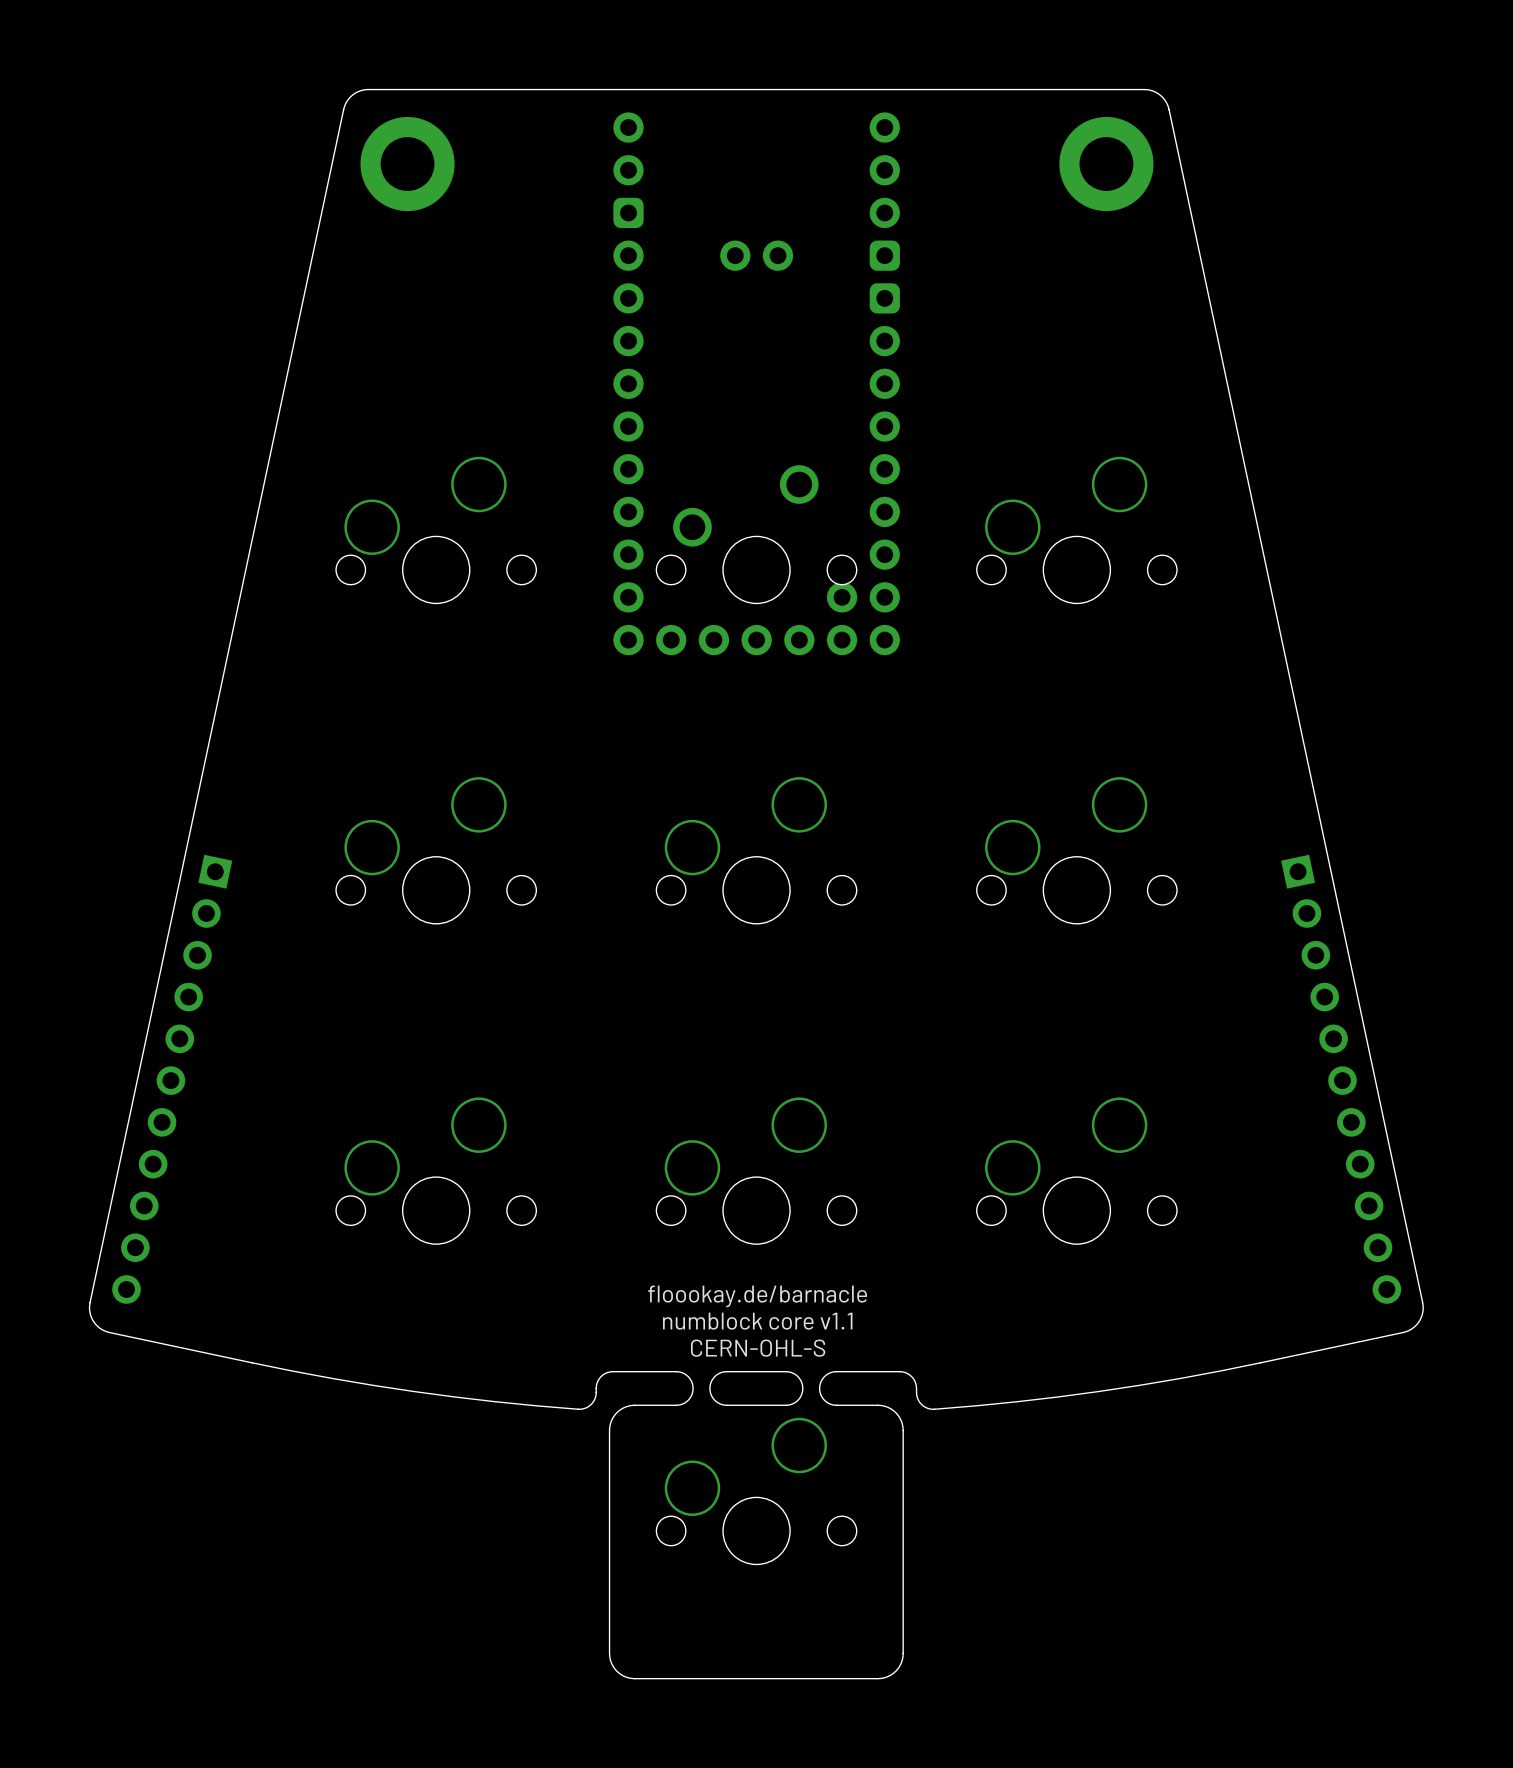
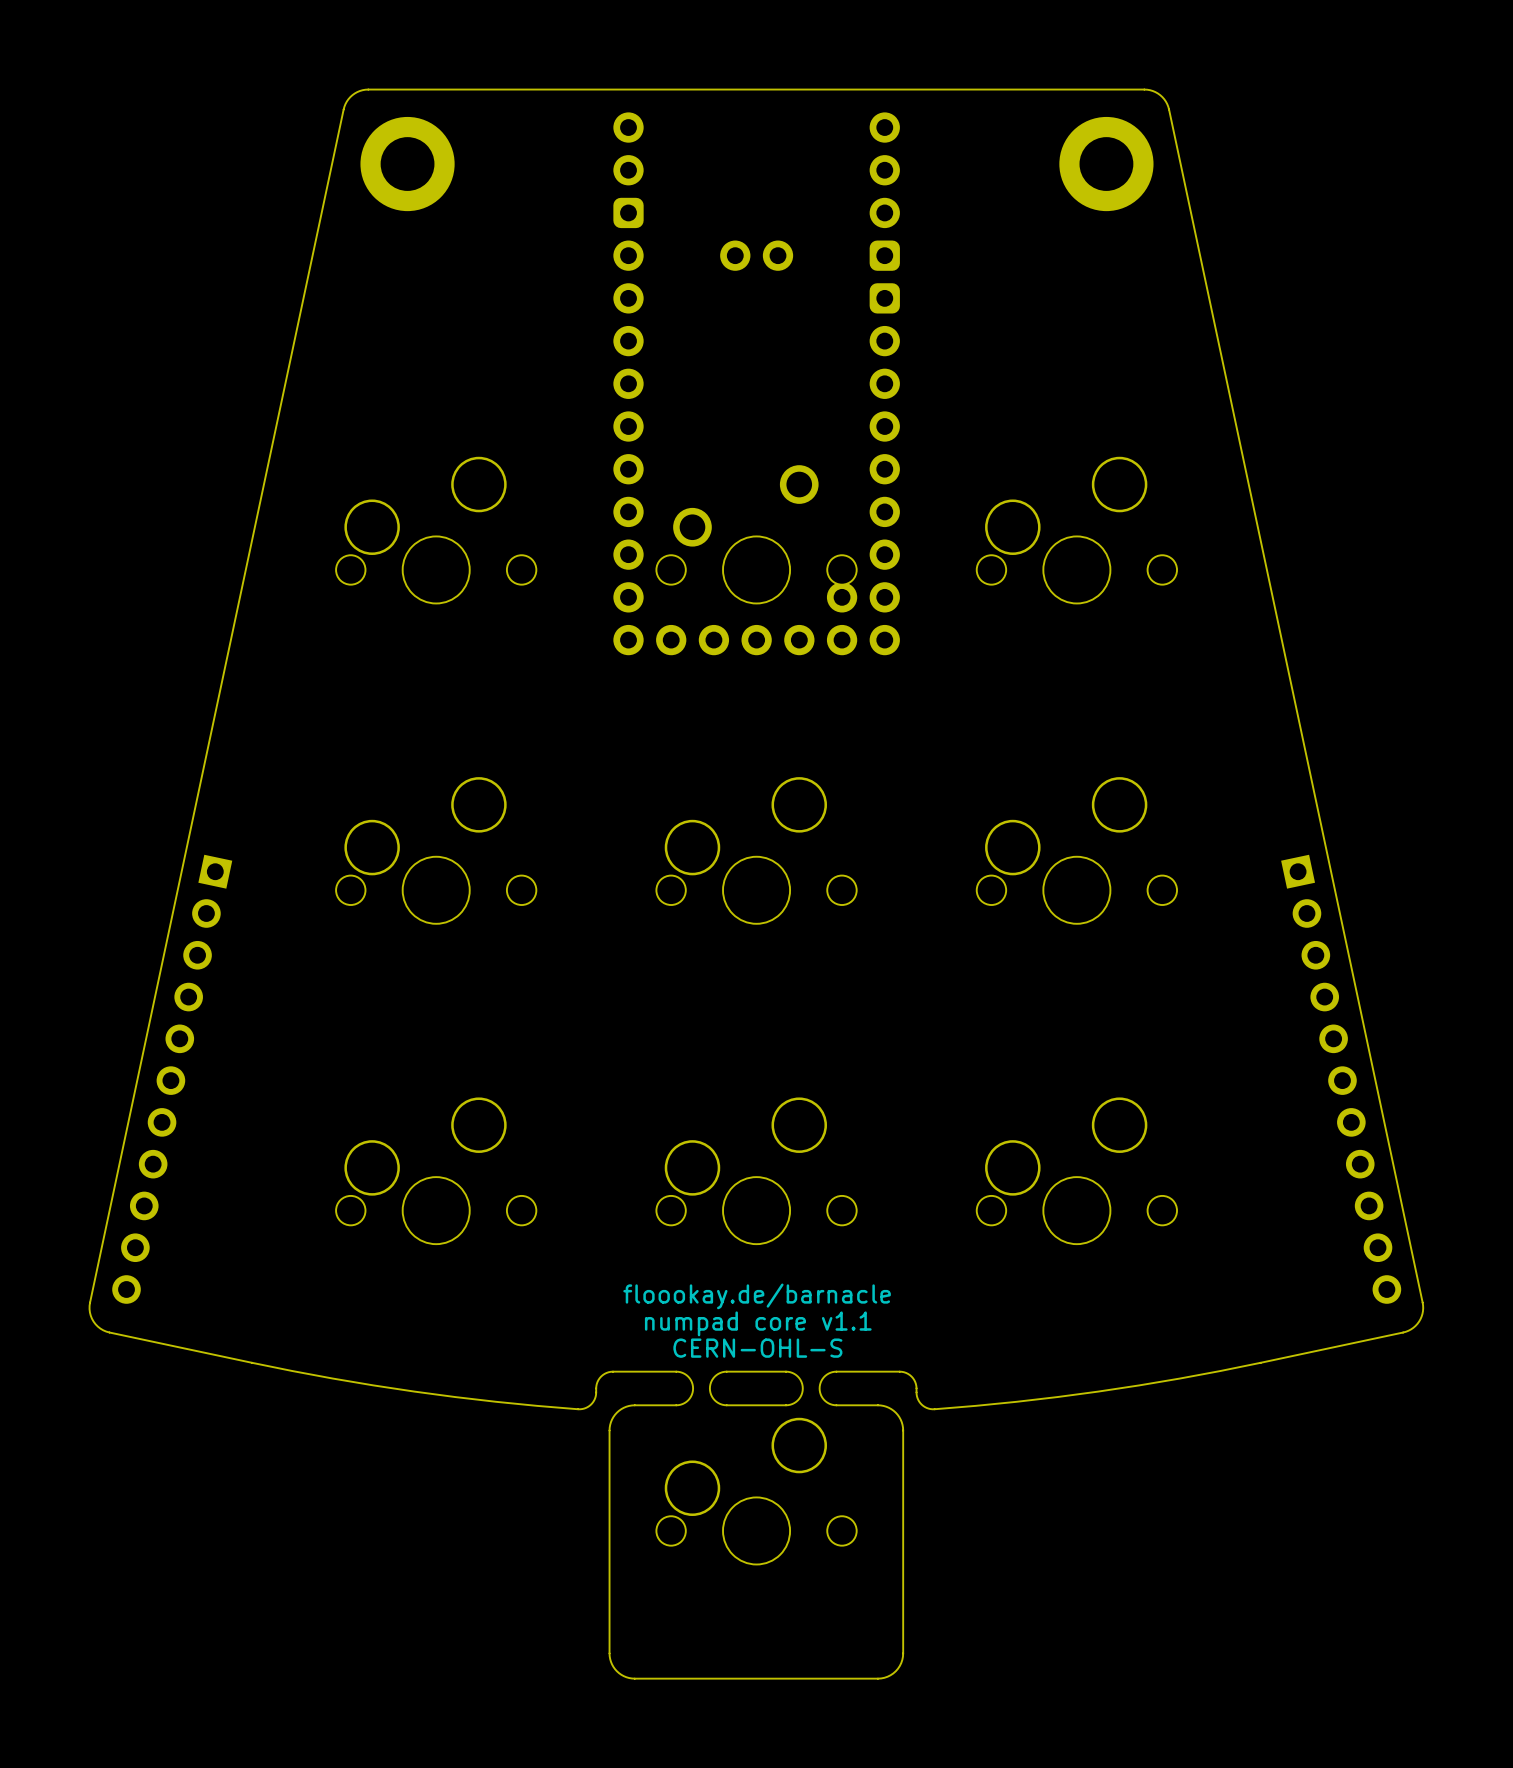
text: numblock core v1.1 (757, 1321) -> numpad core v1.1 (758, 1323)

